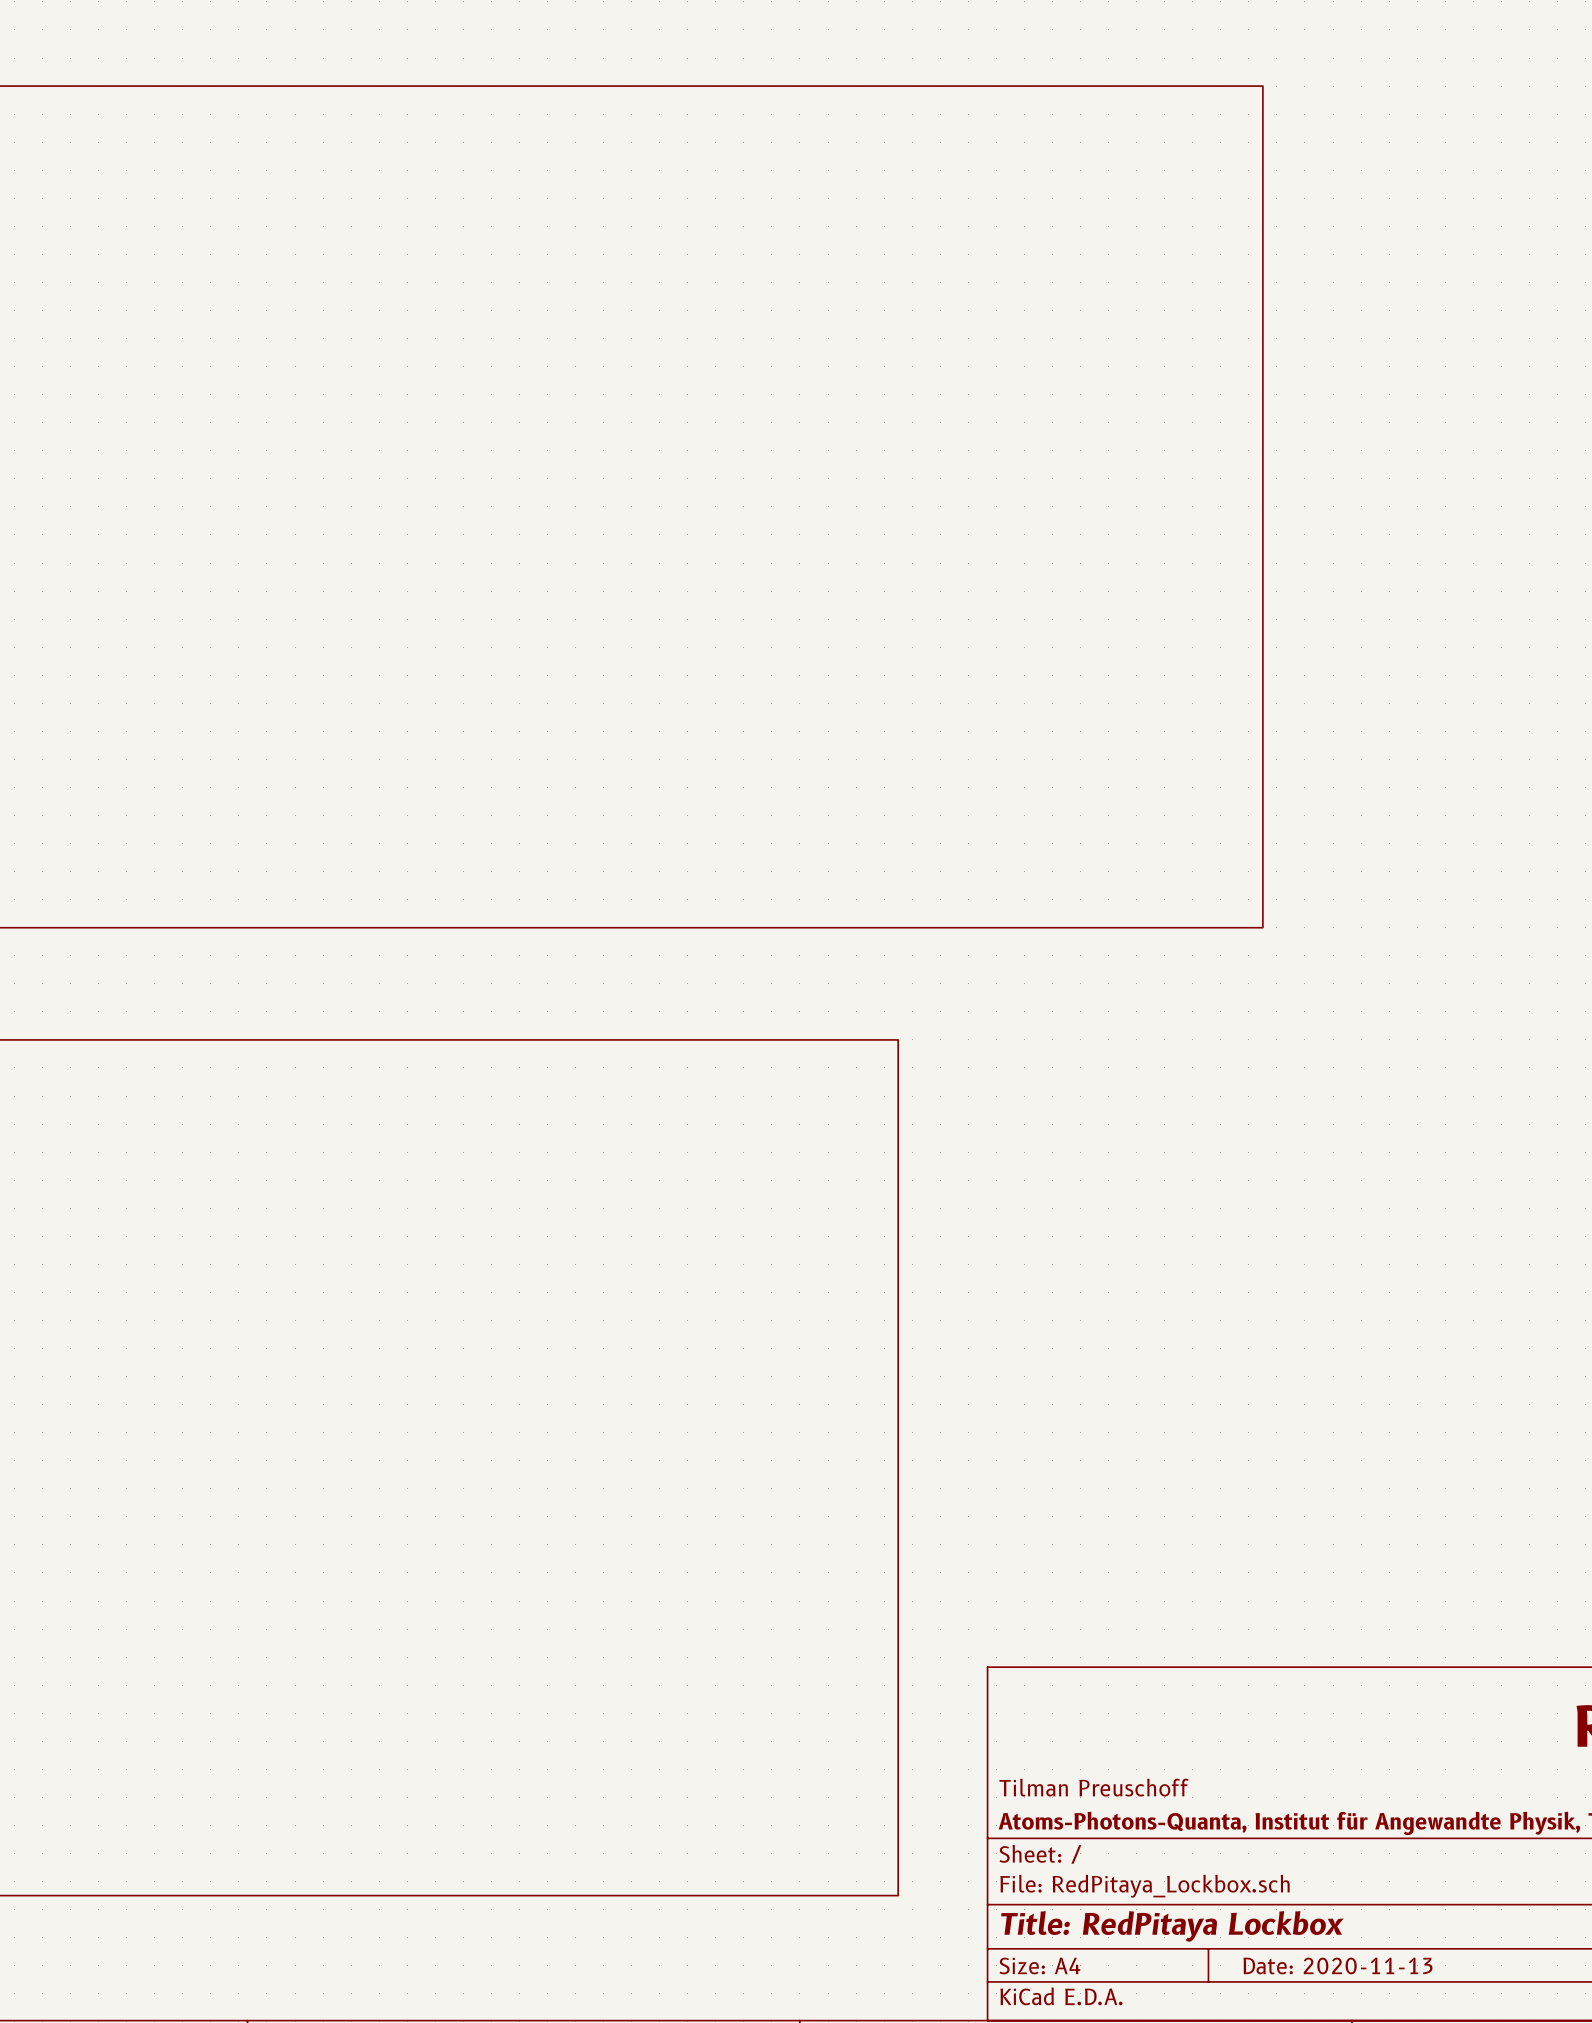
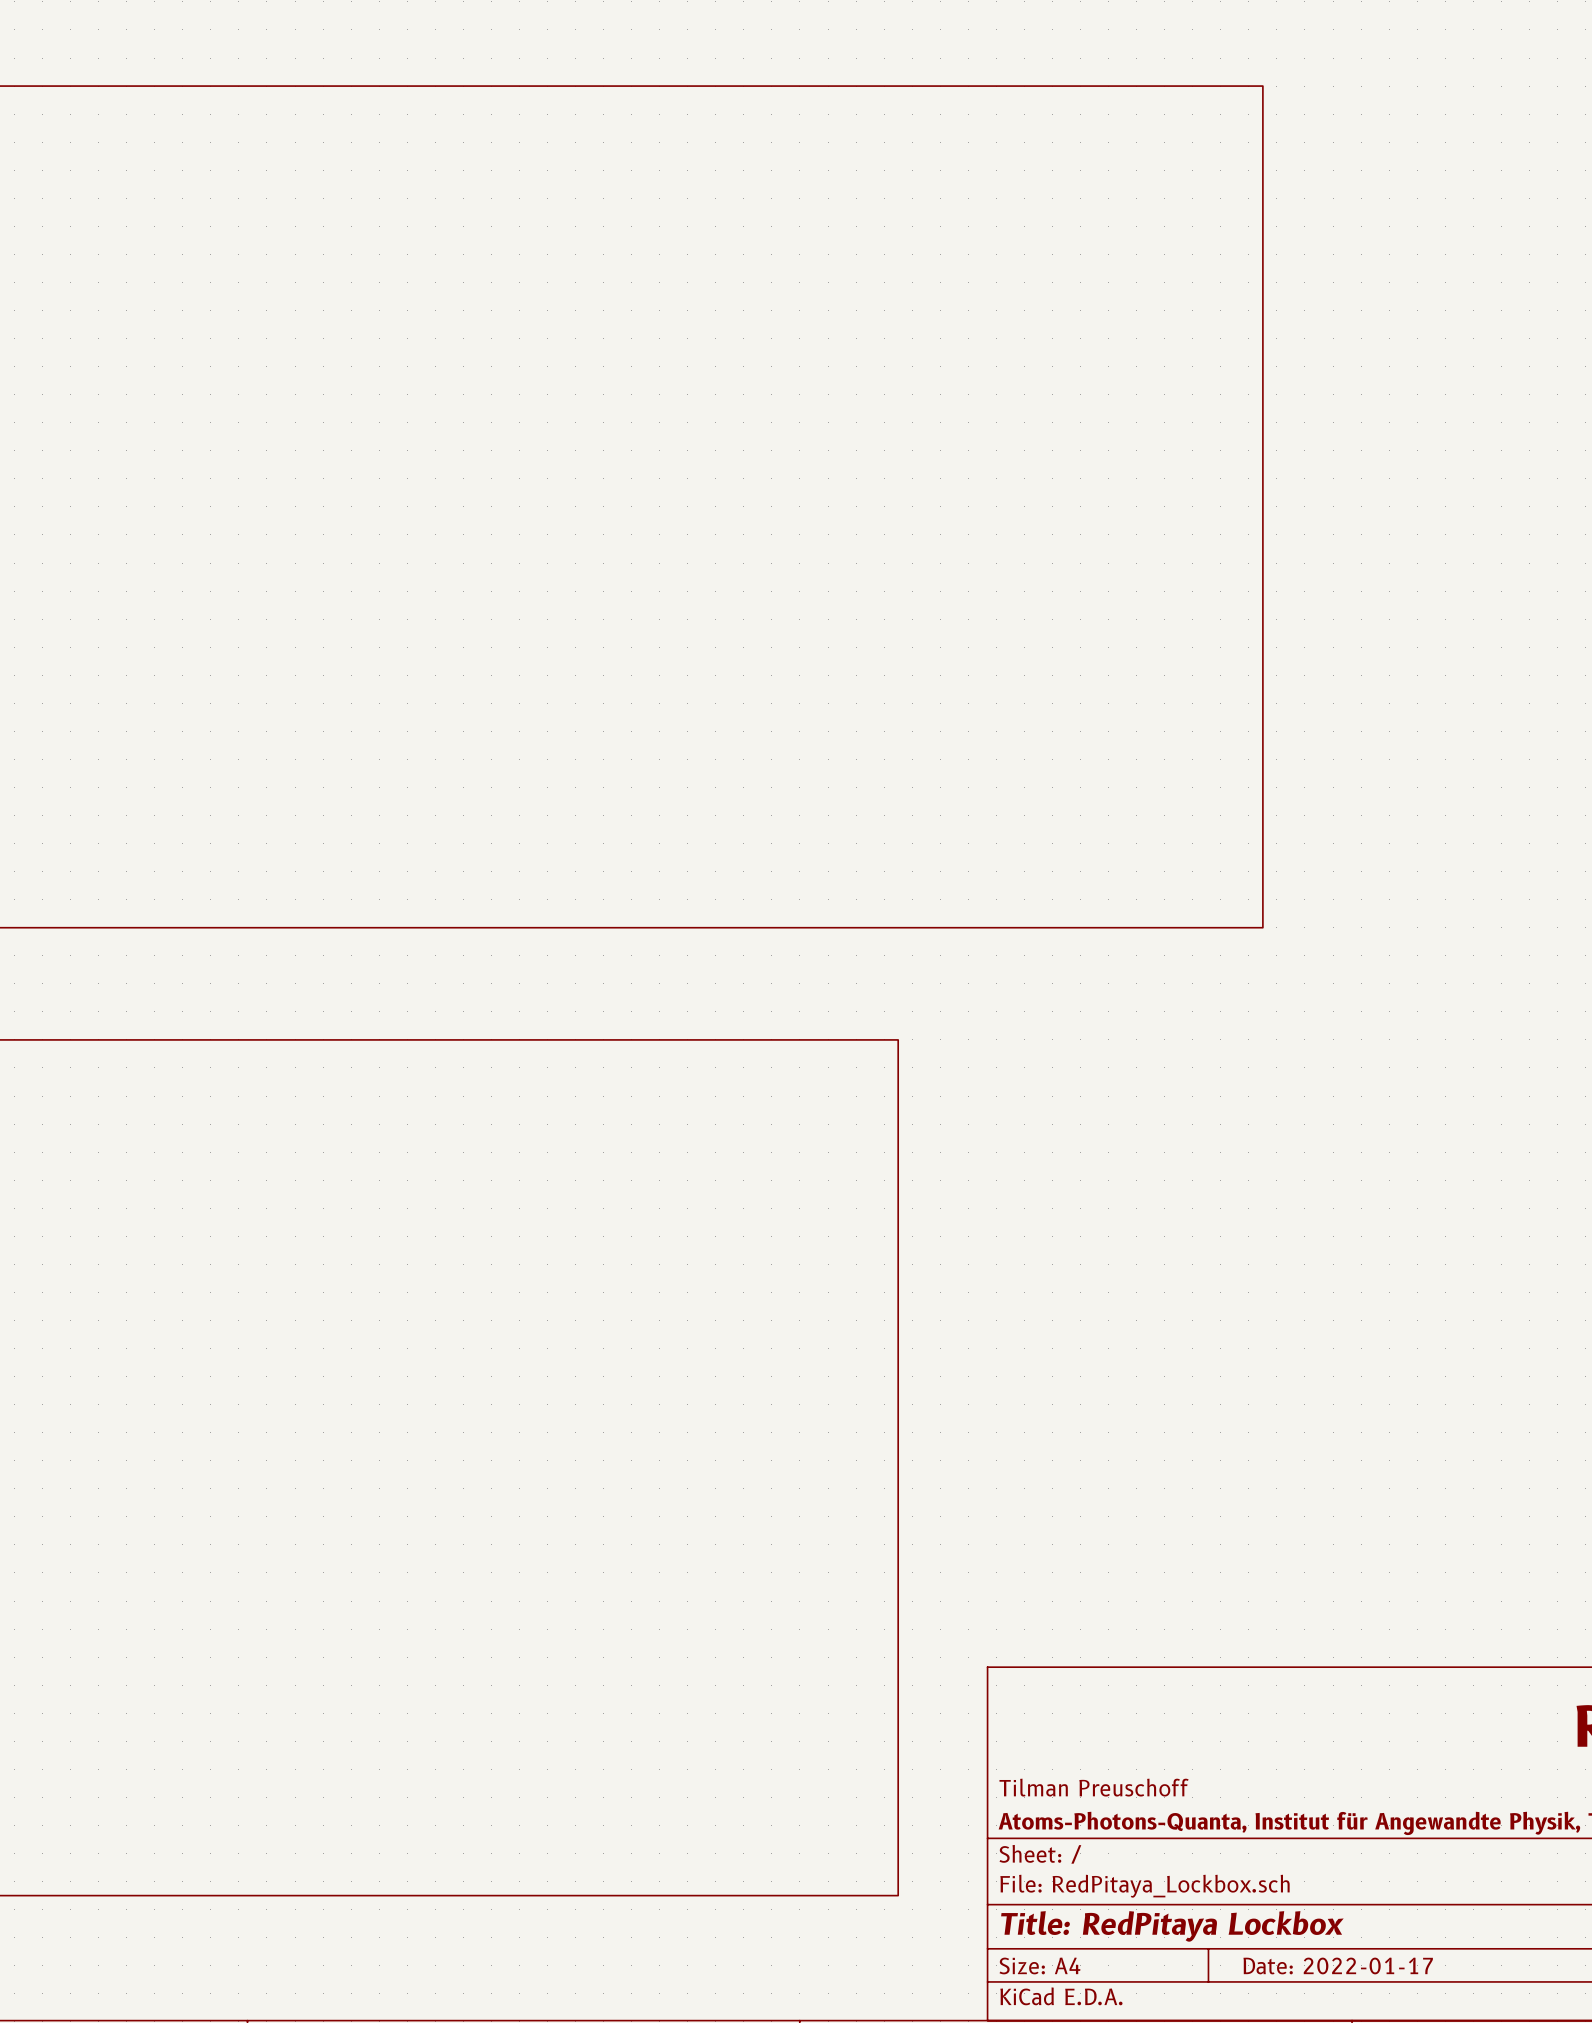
title block: Date: 2020-11-13 (1337, 1965) -> Date: 2022-01-17 (1338, 1965)

